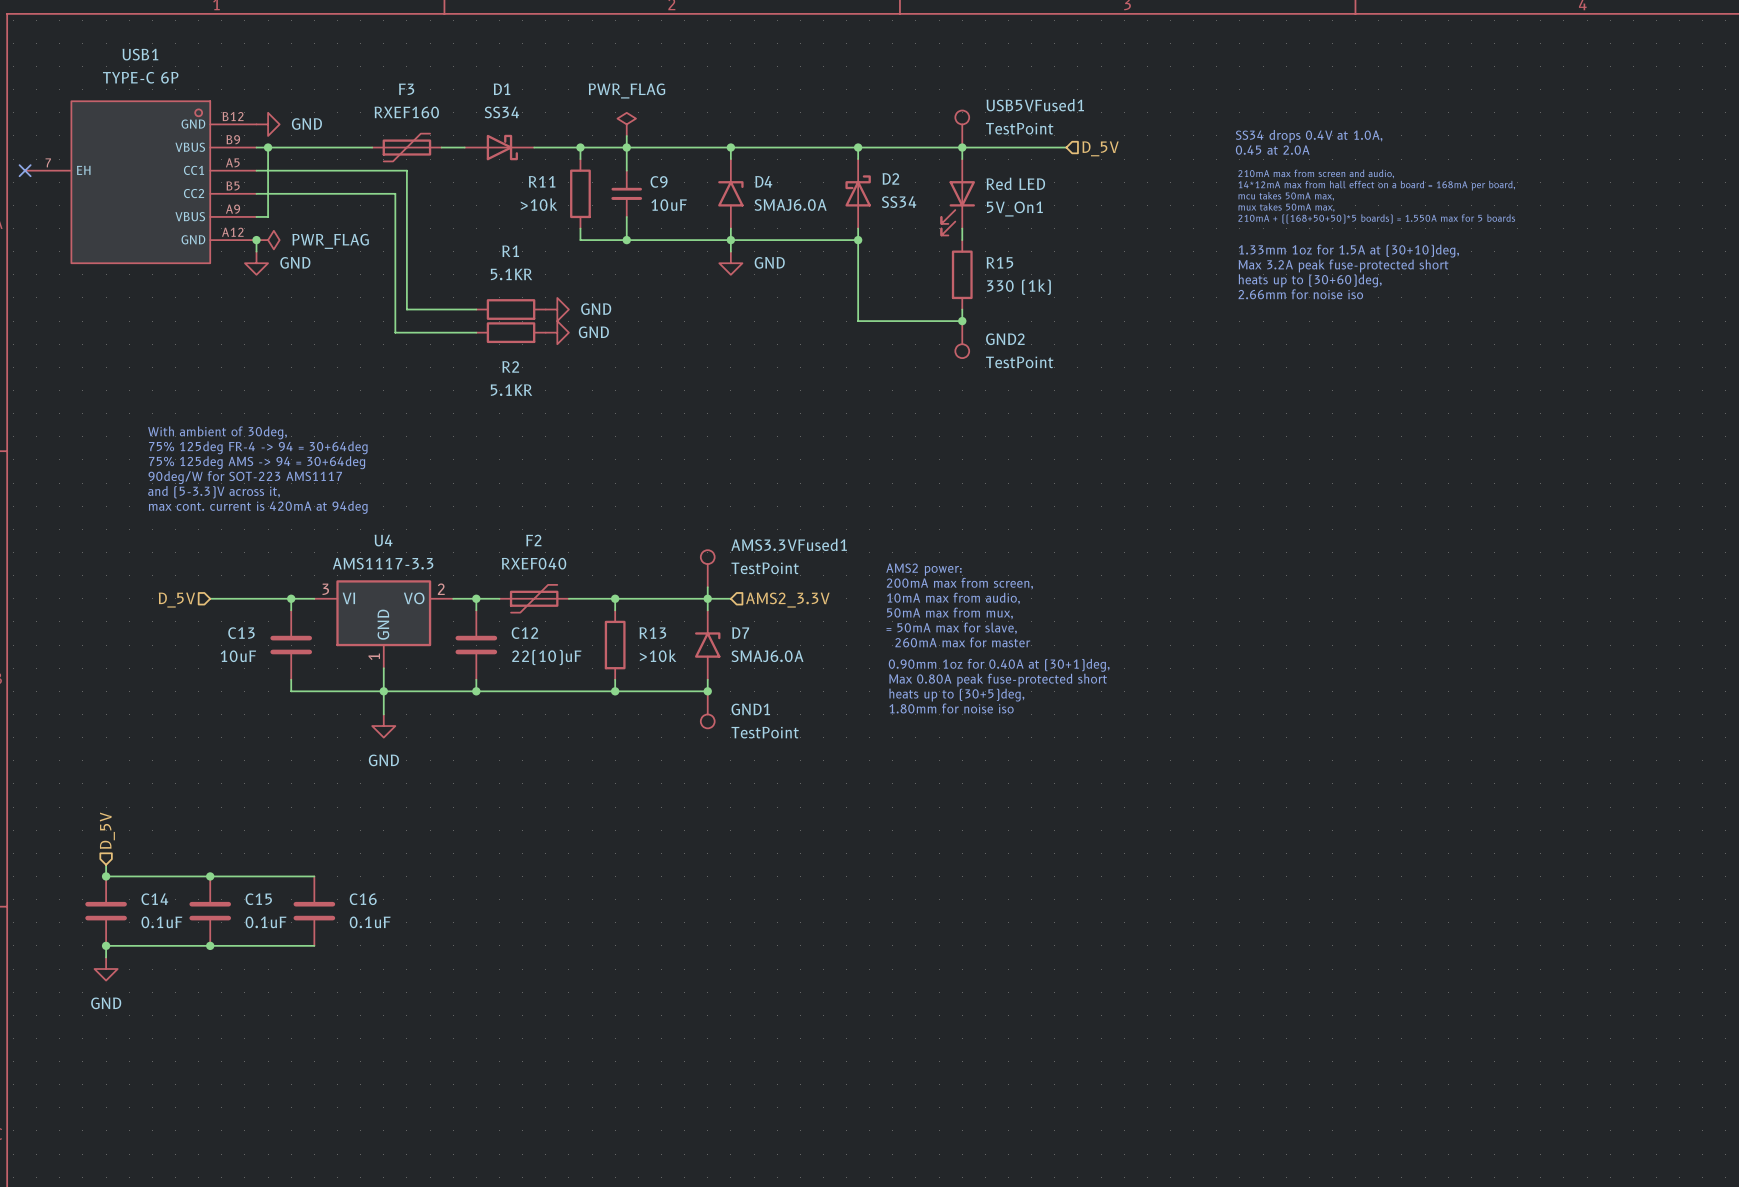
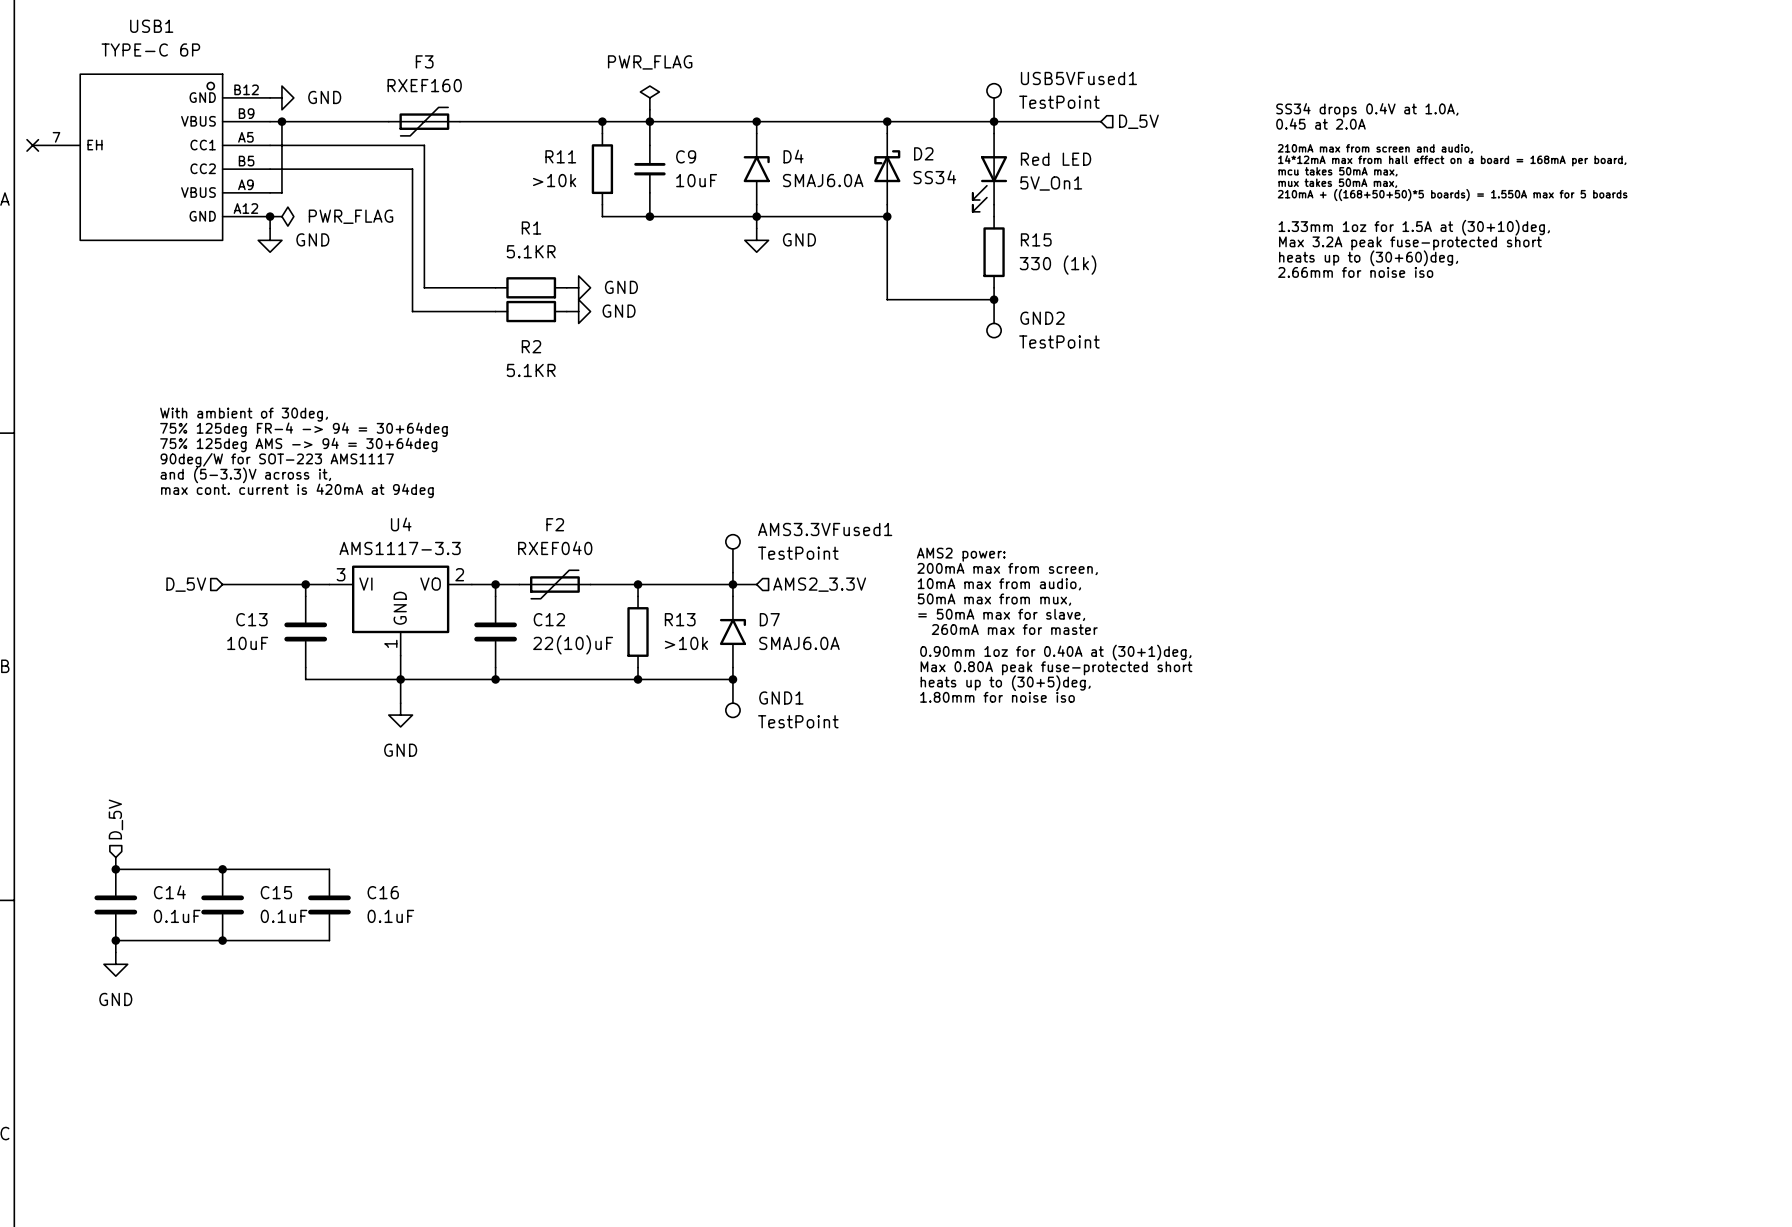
D1: SS34 (499, 147) -> none

